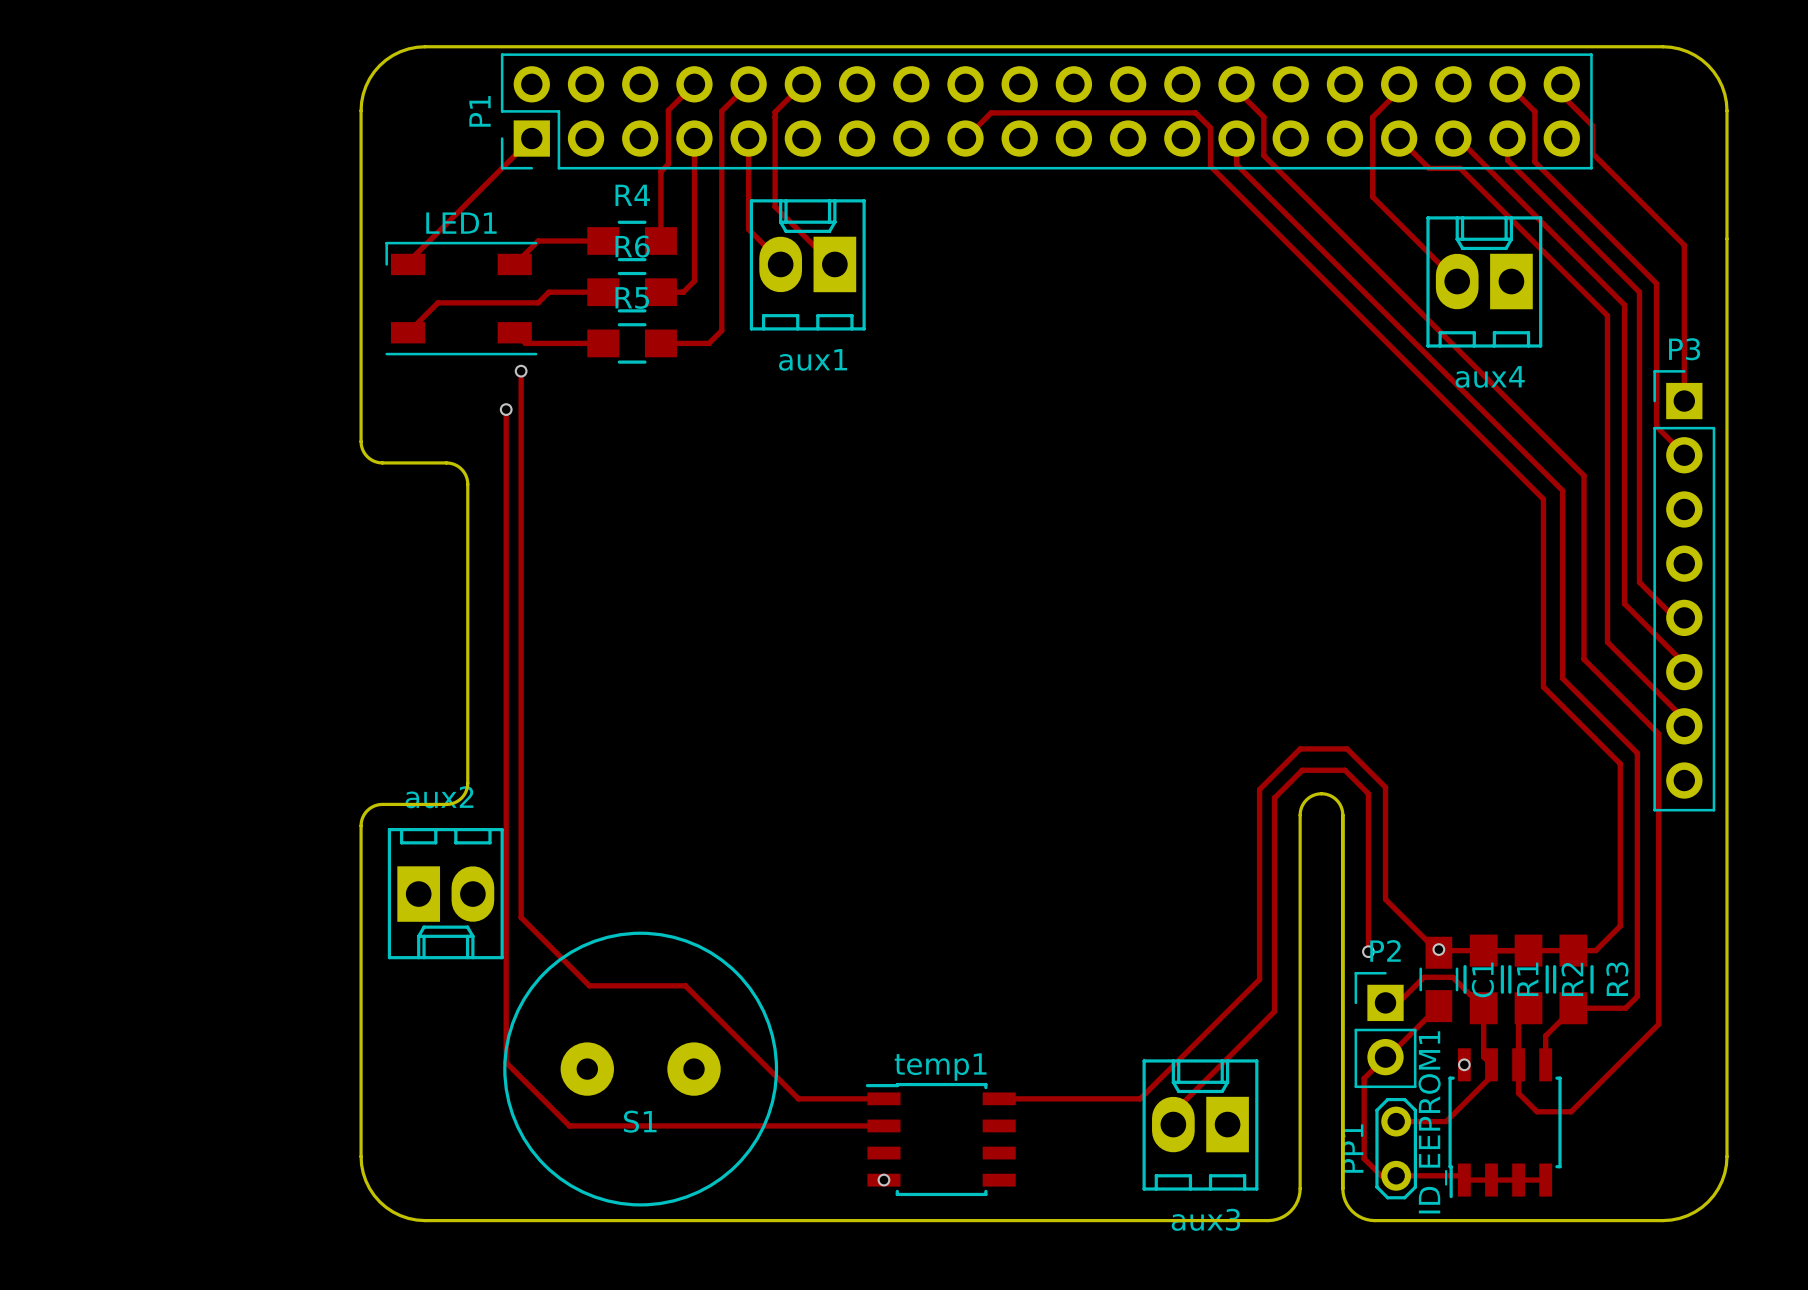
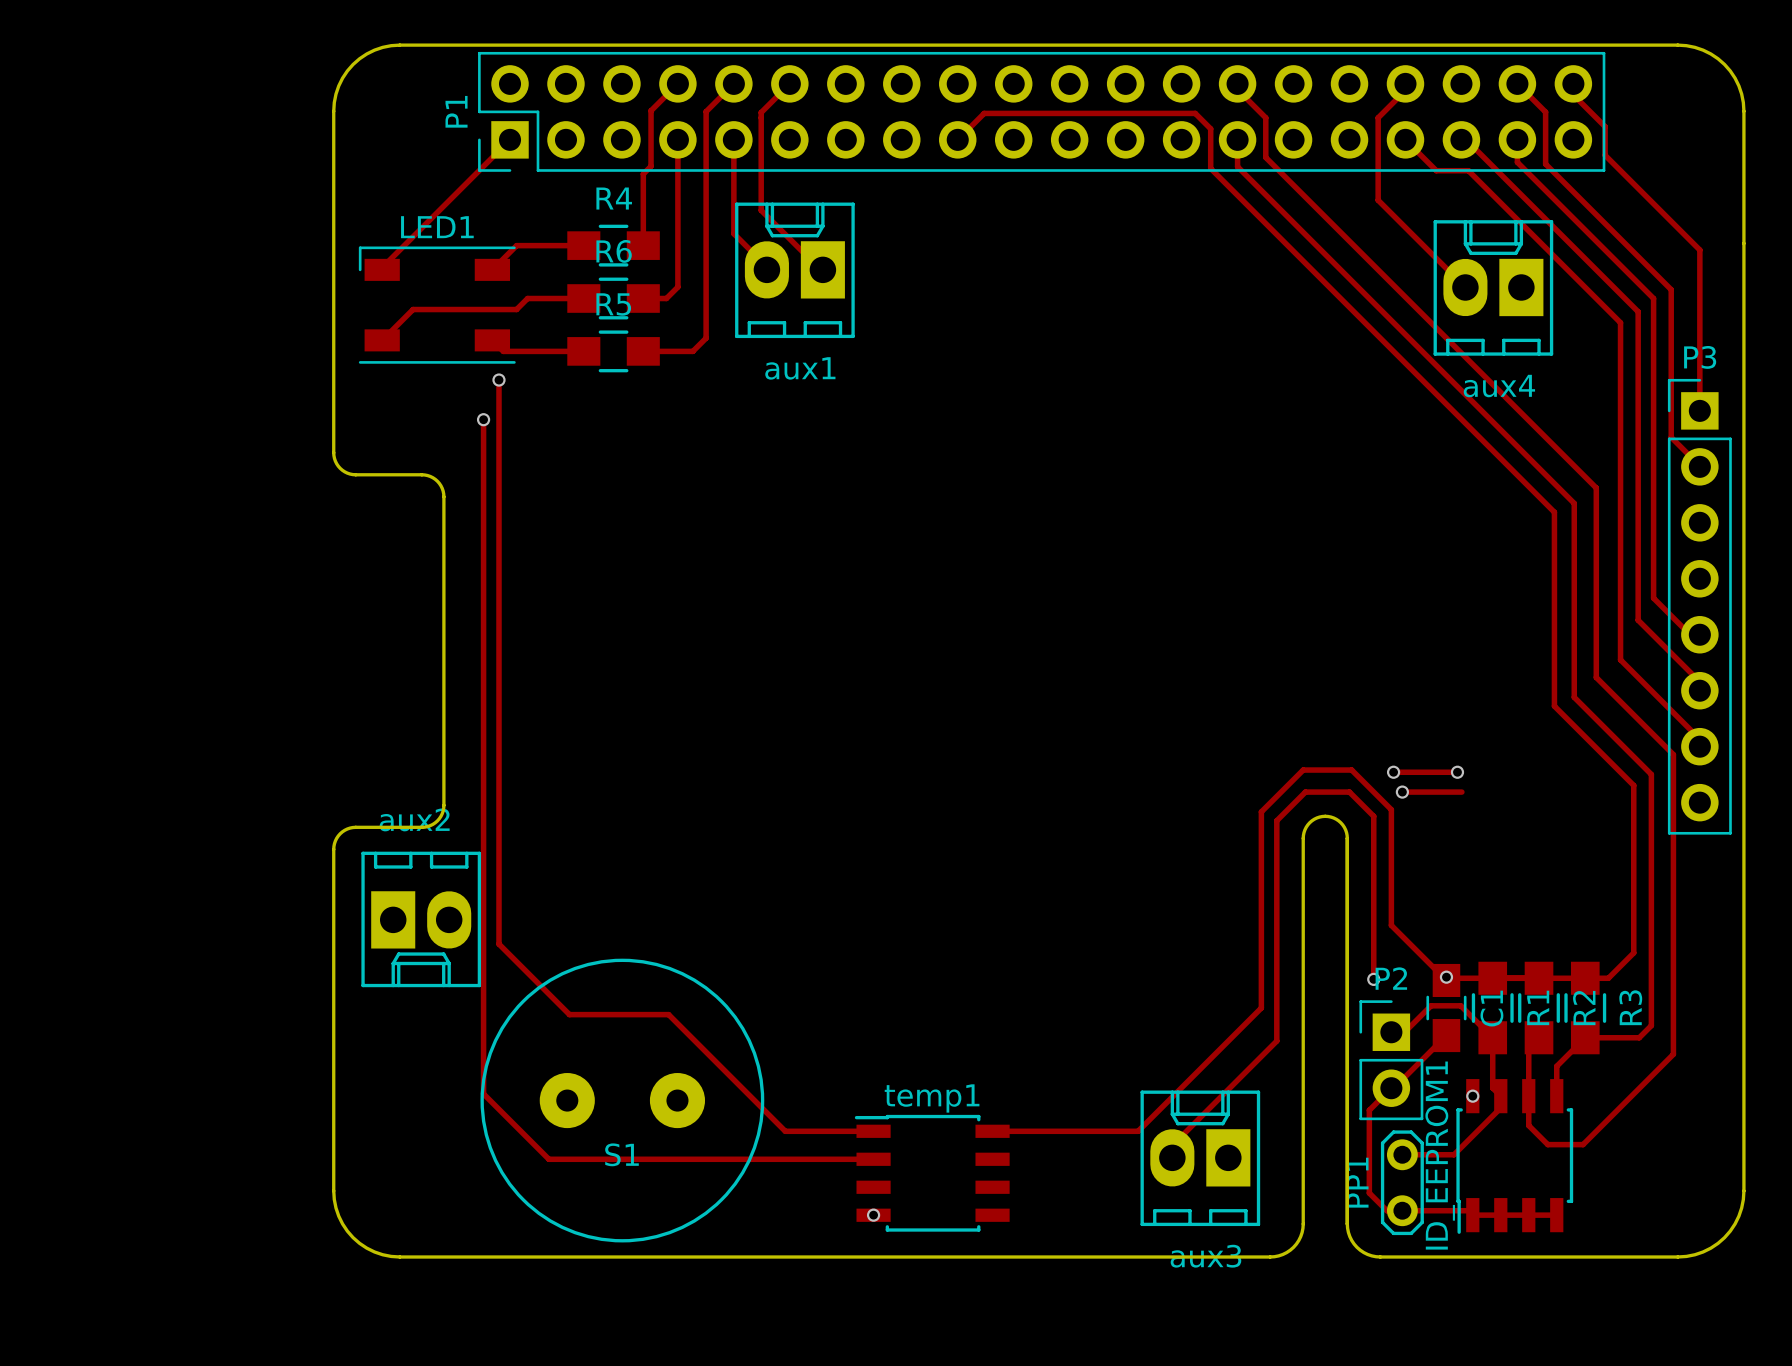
track: none -> (1393, 772) (1457, 772)
via: none -> (1393, 772)
via: none -> (1457, 772)
track: none -> (1402, 792) (1461, 792)
via: none -> (1402, 792)

